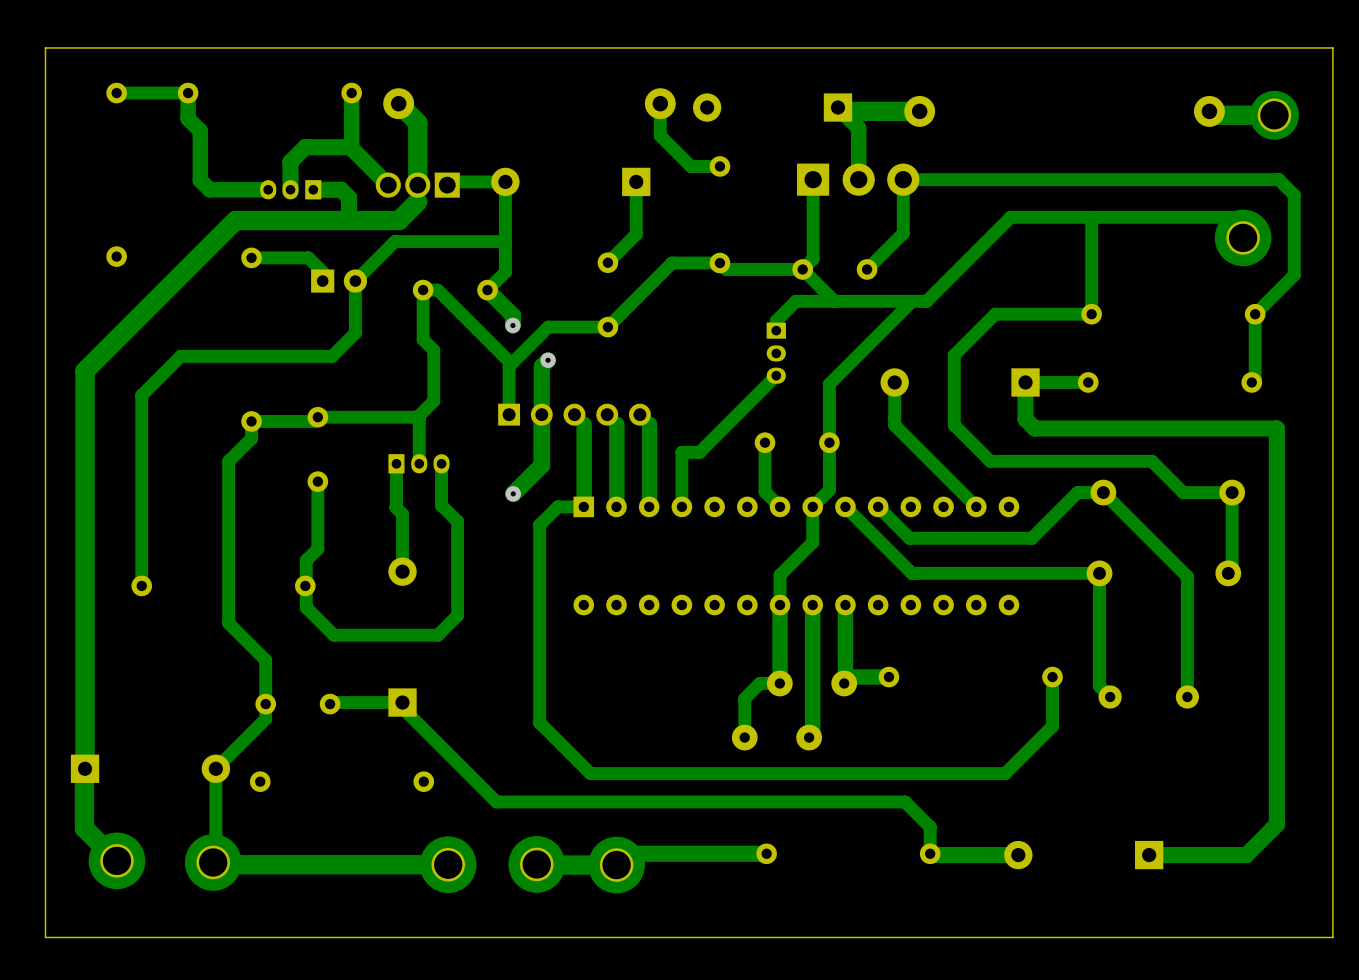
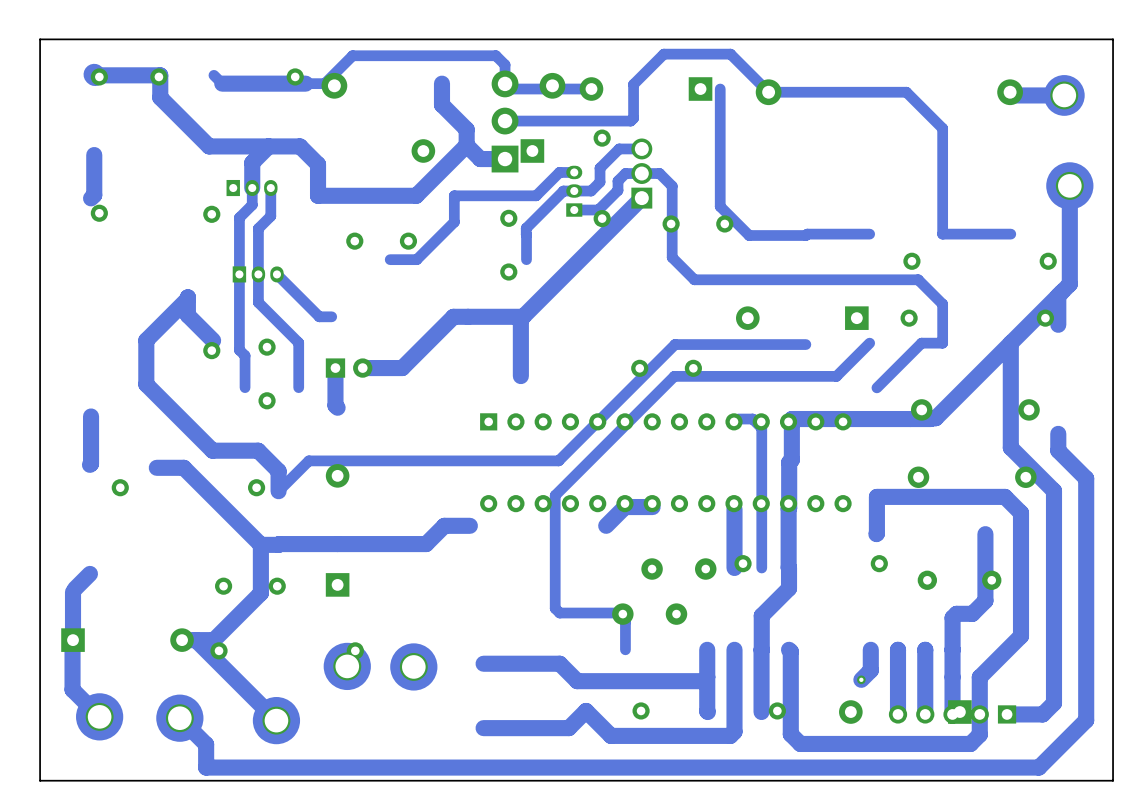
track: none -> (94, 74) (160, 75) (160, 97) (209, 146) (300, 146) (318, 164) (318, 195) (416, 195) (466, 145)
track: none -> (213, 75) (222, 83) (324, 83) (352, 55) (495, 55) (505, 64) (505, 83) (510, 89) (583, 89)
track: (116, 93) (188, 93) (188, 118) (200, 131) (200, 180) (209, 189) (268, 189) -> none
track: (351, 93) (350, 147) -> none
track: none -> (441, 83) (441, 104) (466, 129) (466, 145)
track: (398, 103) (417, 122) (417, 201) (398, 220) (235, 220) (85, 370) (85, 711) -> (89, 573) (73, 592)
track: (660, 103) (660, 135) (690, 166) (719, 166) -> none
track: none -> (720, 89) (720, 206) (749, 235) (869, 234)
track: (919, 111) (841, 111) (837, 107) (858, 128) (858, 179) -> none
track: none -> (505, 121) (630, 121) (633, 118) (633, 84) (663, 54) (730, 54) (768, 92) (906, 92) (942, 128) (942, 234) (1010, 234)
track: (350, 147) (305, 147) (290, 161) (290, 189) -> none
track: (350, 147) (388, 185) -> none
track: none -> (466, 145) (480, 159) (505, 159)
track: none -> (268, 146) (252, 162) (252, 204) (239, 217) (239, 350) (245, 355) (245, 387)
track: none -> (641, 148) (619, 148) (600, 168) (600, 182) (591, 191) (563, 191) (526, 228) (526, 259)
track: (813, 179) (813, 259) (802, 269) -> none
part rotation: 0° (858, 179) -> 90° counterclockwise (505, 121)
part position: (858, 179) -> (505, 121)
track: (636, 181) (636, 234) (607, 262) -> none
part: (417, 185) -> none
track: (447, 185) (450, 181) (505, 181) (505, 272) (487, 290) (512, 315) (512, 325) -> none
track: none -> (94, 155) (94, 195) (91, 198)
part rotation: 0° (290, 189) -> 180° (252, 188)
part position: (290, 189) -> (252, 188)
track: (313, 189) (341, 189) (349, 197) (349, 220) -> none
track: none -> (574, 172) (559, 172) (536, 195) (454, 195) (454, 222) (416, 259) (390, 259)
part: none -> (641, 173)
track: (1091, 217) (1091, 314) (995, 314) (954, 355) (954, 425) (990, 461) (1151, 461) (1183, 492) (1232, 492) (1232, 569) (1228, 573) -> none
track: (1232, 217) (1010, 217) (926, 301) (795, 301) (776, 320) (776, 330) -> none
track: none -> (1069, 185) (1069, 284) (935, 418) (791, 419) (791, 459) (789, 462) (789, 588) (761, 615) (761, 712)
track: none -> (270, 188) (270, 216) (258, 228) (258, 302) (298, 342) (298, 387)
part position: (1243, 237) -> (1069, 185)
track: none -> (641, 198) (520, 319) (520, 376)
track: (505, 241) (394, 241) (355, 281) (355, 333) (332, 356) (180, 356) (141, 395) (141, 585) -> none
track: none -> (574, 210) (598, 210) (618, 190) (618, 181) (625, 173) (659, 173) (672, 186) (672, 257) (694, 279) (918, 279) (942, 304) (942, 343) (921, 343) (876, 387)
track: (251, 257) (308, 257) (322, 272) (322, 281) -> none
track: (802, 269) (726, 269) (719, 263) (671, 263) (607, 327) (548, 327) (509, 366) (509, 414) -> none
track: (802, 269) (834, 301) -> none
track: (867, 269) (903, 233) (903, 179) (1278, 179) (1294, 195) (1294, 275) (1255, 314) (1255, 379) (1251, 382) -> none
part position: (339, 281) -> (349, 368)
track: (912, 301) (829, 384) (829, 490) (812, 506) (812, 542) (780, 575) (780, 683) (759, 683) (744, 698) (744, 737) -> none
via: (512, 325) -> none
part: none -> (258, 274)
track: none -> (276, 274) (319, 316) (331, 316)
part rotation: 0° (776, 353) -> 180° (574, 191)
part position: (776, 353) -> (574, 191)
track: none -> (1058, 295) (1058, 324)
track: none -> (187, 297) (187, 315) (213, 340)
track: none -> (187, 298) (146, 340) (146, 384) (212, 450) (258, 450) (278, 471) (278, 491) (308, 460) (558, 460) (675, 344) (805, 344)
track: (548, 360) (541, 366) (541, 465) (513, 493) -> none
via: (548, 360) -> none
track: (511, 363) (437, 290) (423, 290) (423, 339) (433, 350) (433, 401) (417, 417) (317, 417) (313, 421) (251, 421) (251, 438) (228, 461) (228, 623) (265, 660) (265, 718) (215, 768) (215, 859) -> none
track: (776, 375) (699, 452) (681, 452) (681, 506) -> none
track: none -> (523, 316) (453, 316) (402, 368) (362, 368)
track: (894, 382) (894, 425) (976, 506) -> none
track: (1088, 382) (1025, 382) (1025, 419) (1034, 428) (1276, 428) (1276, 824) (1246, 855) (1149, 855) -> none
track: none -> (869, 343) (836, 376) (674, 376) (555, 495) (555, 608) (559, 613) (616, 613) (625, 621) (625, 649)
track: none -> (1010, 343) (1010, 447) (1054, 490) (1054, 703) (1042, 714) (1007, 714)
track: (574, 414) (584, 424) (584, 506) (557, 506) (539, 525) (539, 722) (590, 773) (1005, 773) (1052, 726) (1052, 677) -> none
part: (574, 414) -> none
track: (607, 414) (616, 424) (616, 506) -> none
track: (639, 414) (649, 424) (649, 506) -> none
track: (417, 416) (419, 463) -> none
track: none -> (335, 368) (335, 405) (337, 407)
track: (765, 442) (765, 491) (780, 506) -> none
track: (396, 463) (395, 507) (402, 514) (402, 571) -> none
part: (419, 463) -> none
track: (441, 463) (441, 505) (457, 521) (457, 615) (437, 635) (333, 635) (306, 607) (306, 560) (317, 548) (317, 481) -> none
via: (513, 493) -> none
track: none -> (91, 416) (89, 464)
track: none -> (738, 419) (752, 419) (761, 428) (761, 568)
track: (845, 506) (911, 573) (1099, 573) (1099, 686) (1110, 697) -> none
track: (878, 506) (909, 538) (1031, 538) (1077, 492) (1103, 492) (1187, 576) (1187, 697) -> none
track: none -> (156, 467) (183, 467) (260, 544)
track: (812, 605) (812, 733) (809, 737) -> none
track: (845, 605) (845, 682) -> none
track: none -> (652, 507) (624, 507) (606, 525)
track: none -> (734, 508) (734, 568)
track: none -> (469, 525) (444, 525) (426, 544) (260, 544)
track: none -> (876, 534) (876, 496) (1004, 496) (1021, 512) (1021, 636) (979, 677) (979, 734) (970, 743) (800, 743) (790, 734) (790, 651) (789, 649)
track: none -> (985, 534) (985, 600) (972, 613) (956, 613) (952, 617) (952, 714)
track: none -> (260, 544) (260, 593) (213, 640) (182, 640)
track: (888, 677) (850, 677) (844, 683) -> none
track: (330, 704) (331, 702) (402, 702) (402, 708) (496, 801) (905, 801) (930, 827) (931, 855) (1018, 855) -> none
track: none -> (195, 640) (276, 720)
track: none -> (707, 649) (707, 712)
track: none -> (734, 649) (734, 731) (730, 735) (611, 735) (586, 710) (568, 728) (483, 728)
track: none -> (870, 649) (870, 670) (861, 679)
track: none -> (898, 649) (898, 714)
track: none -> (925, 649) (925, 714)
track: none -> (483, 663) (559, 663) (577, 681) (703, 681) (707, 676)
part: none -> (347, 666)
part: none -> (413, 666)
via: none -> (861, 679)
track: (766, 853) (627, 853) (616, 865) (536, 864) -> none
part: none -> (952, 714)
track: (448, 864) (215, 864) -> (1058, 433) (1058, 450) (1086, 478) (1086, 720) (1038, 767) (206, 767) (206, 744) (181, 720)
part: (448, 864) -> none
part: (536, 864) -> none
part: none -> (276, 720)
part: (616, 865) -> none

